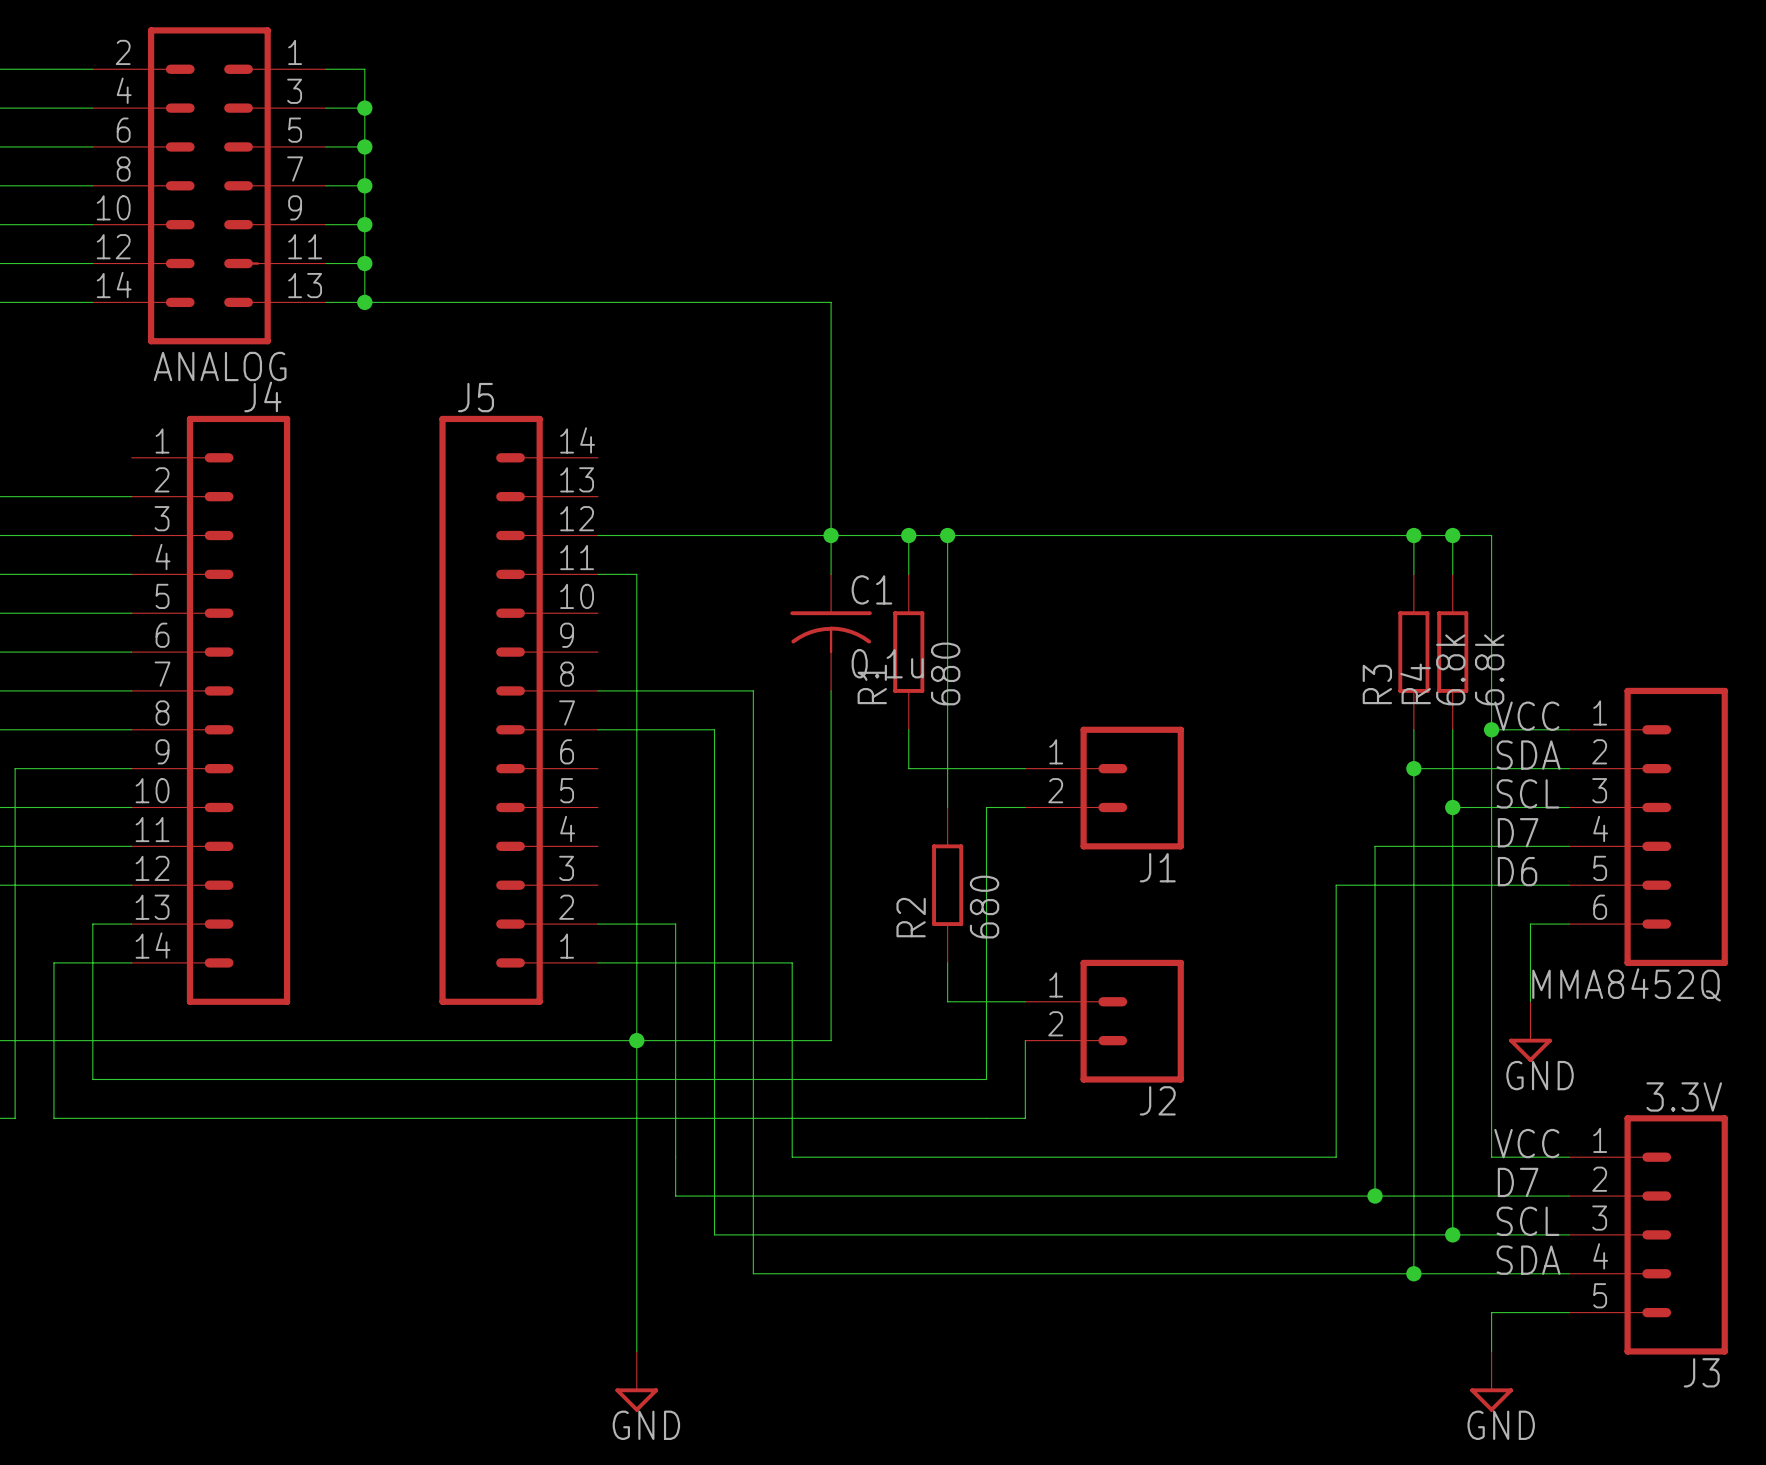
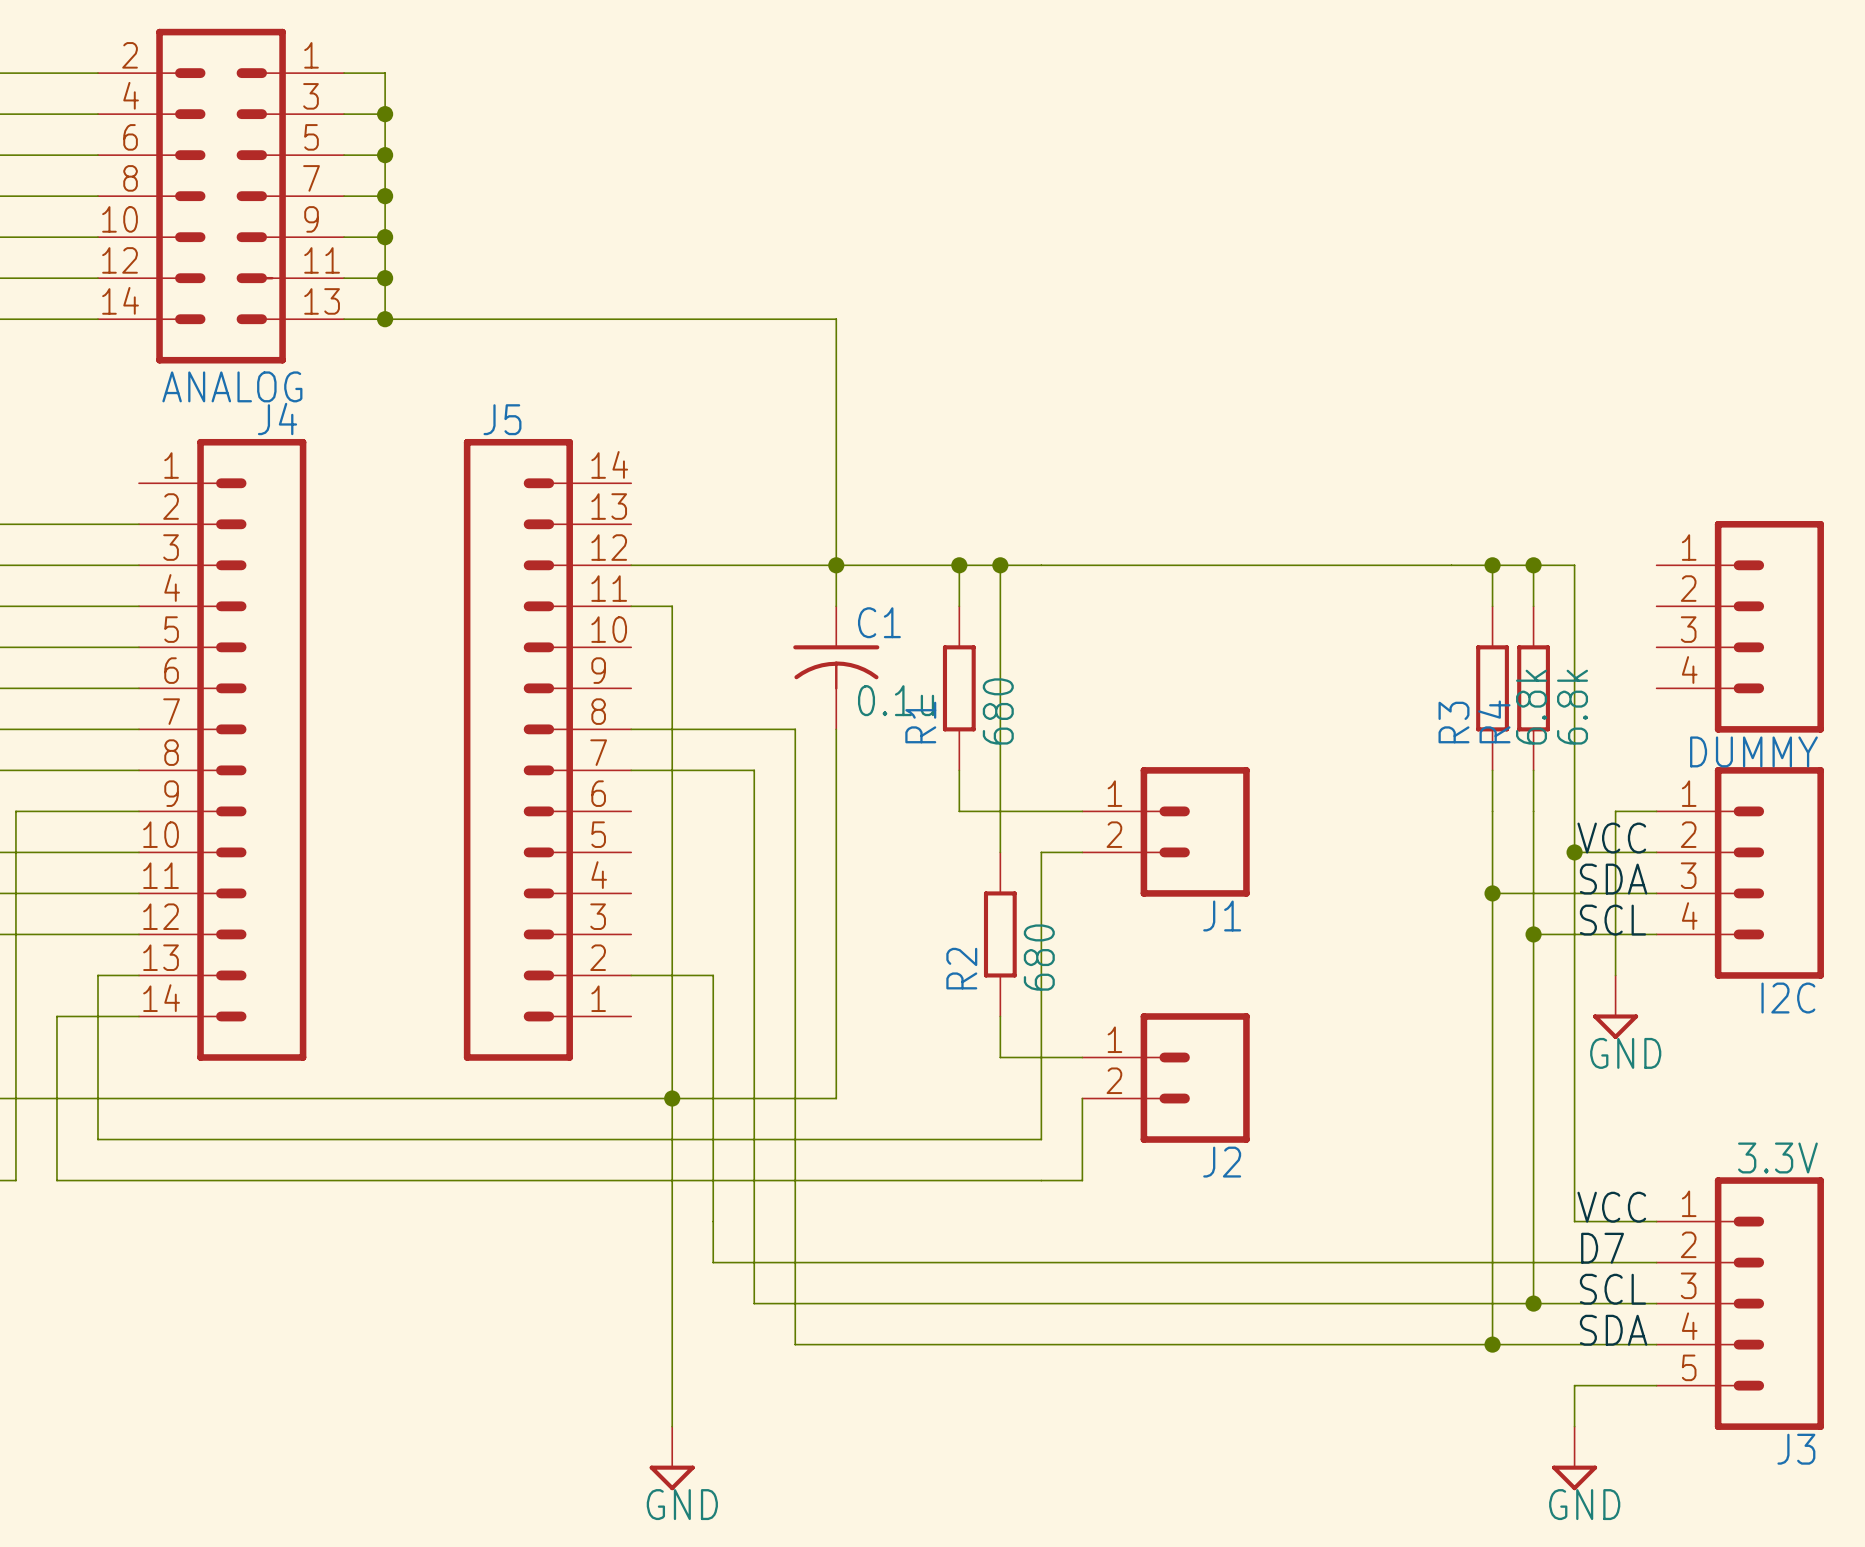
wire: (792, 302) (831, 302) (831, 574) -> (836, 319) (836, 606)
junction position: (831, 535) -> (836, 565)
DUMMY: none -> (1740, 626)
C1 position: (831, 632) -> (836, 667)
wire: (831, 690) (831, 1040) (792, 1040) (792, 1157) (1336, 1157) (1336, 885) (1452, 885) -> none
label: VCC (1526, 716) -> none
wire: (1491, 729) (1569, 729) -> none
junction: (1491, 729) -> none
label: SDA (1528, 755) -> none
wire: (1413, 768) (1530, 768) -> (1615, 975) (1615, 811)
junction: (1413, 768) -> none
label: SCL (1528, 793) -> VCC (1611, 838)
wire: (1452, 807) (1491, 807) -> none
junction: (1452, 807) -> none
junction: none -> (1574, 852)
MMA8452Q: (1648, 826) -> none
I2C: none -> (1740, 872)
label: D7 (1518, 832) -> SDA (1613, 879)
wire: (1413, 846) (1375, 846) (1375, 1196) -> none
junction: none -> (1492, 893)
label: D6 (1517, 871) -> SCL (1613, 920)
junction: none -> (1533, 934)
wire: (1569, 924) (1530, 924) (1530, 1001) -> none
wire: (597, 962) (792, 962) -> (836, 729) (836, 1016)
power symbol position: GND (1530, 1031) -> GND (1615, 1007)
junction: (1375, 1196) -> none

